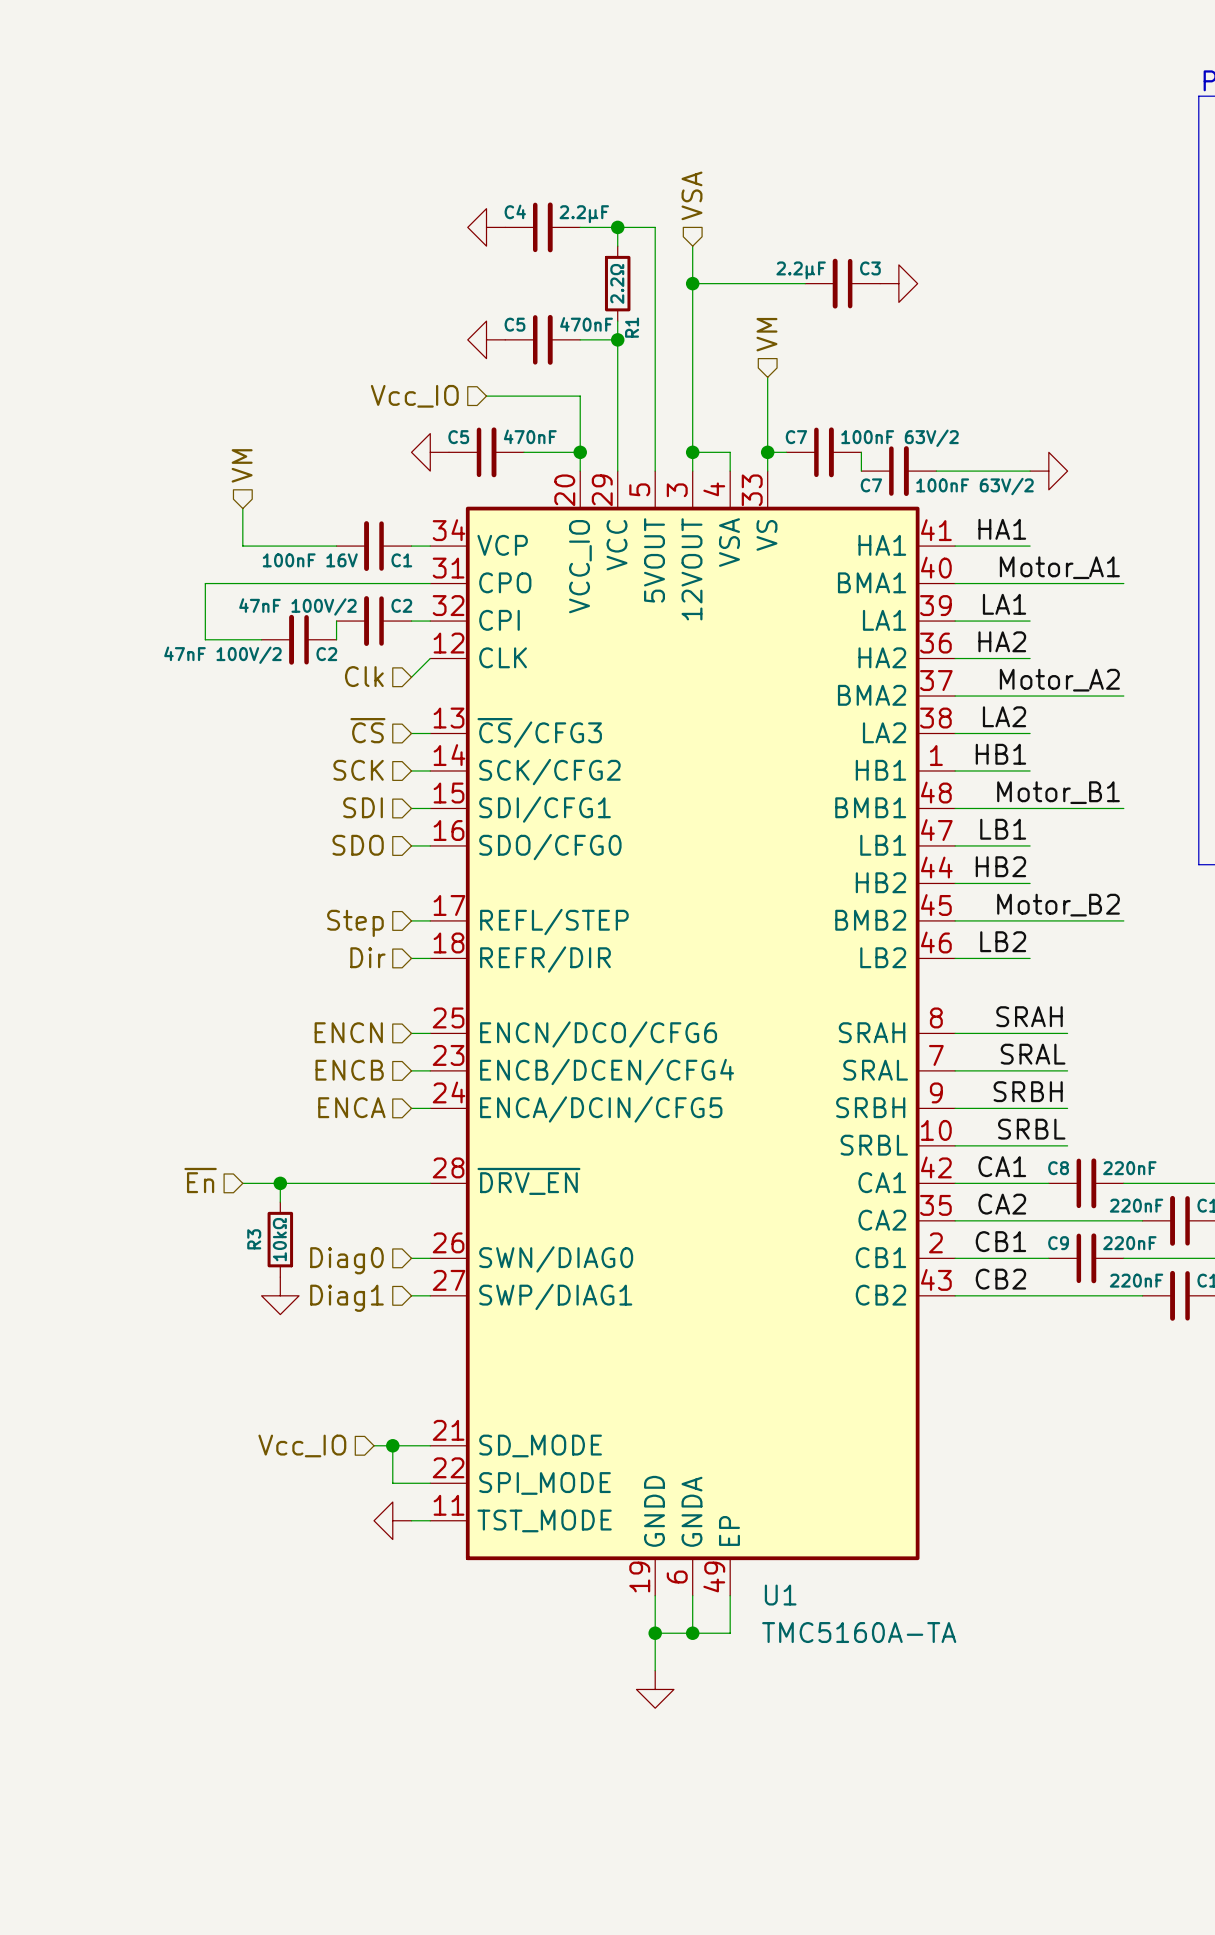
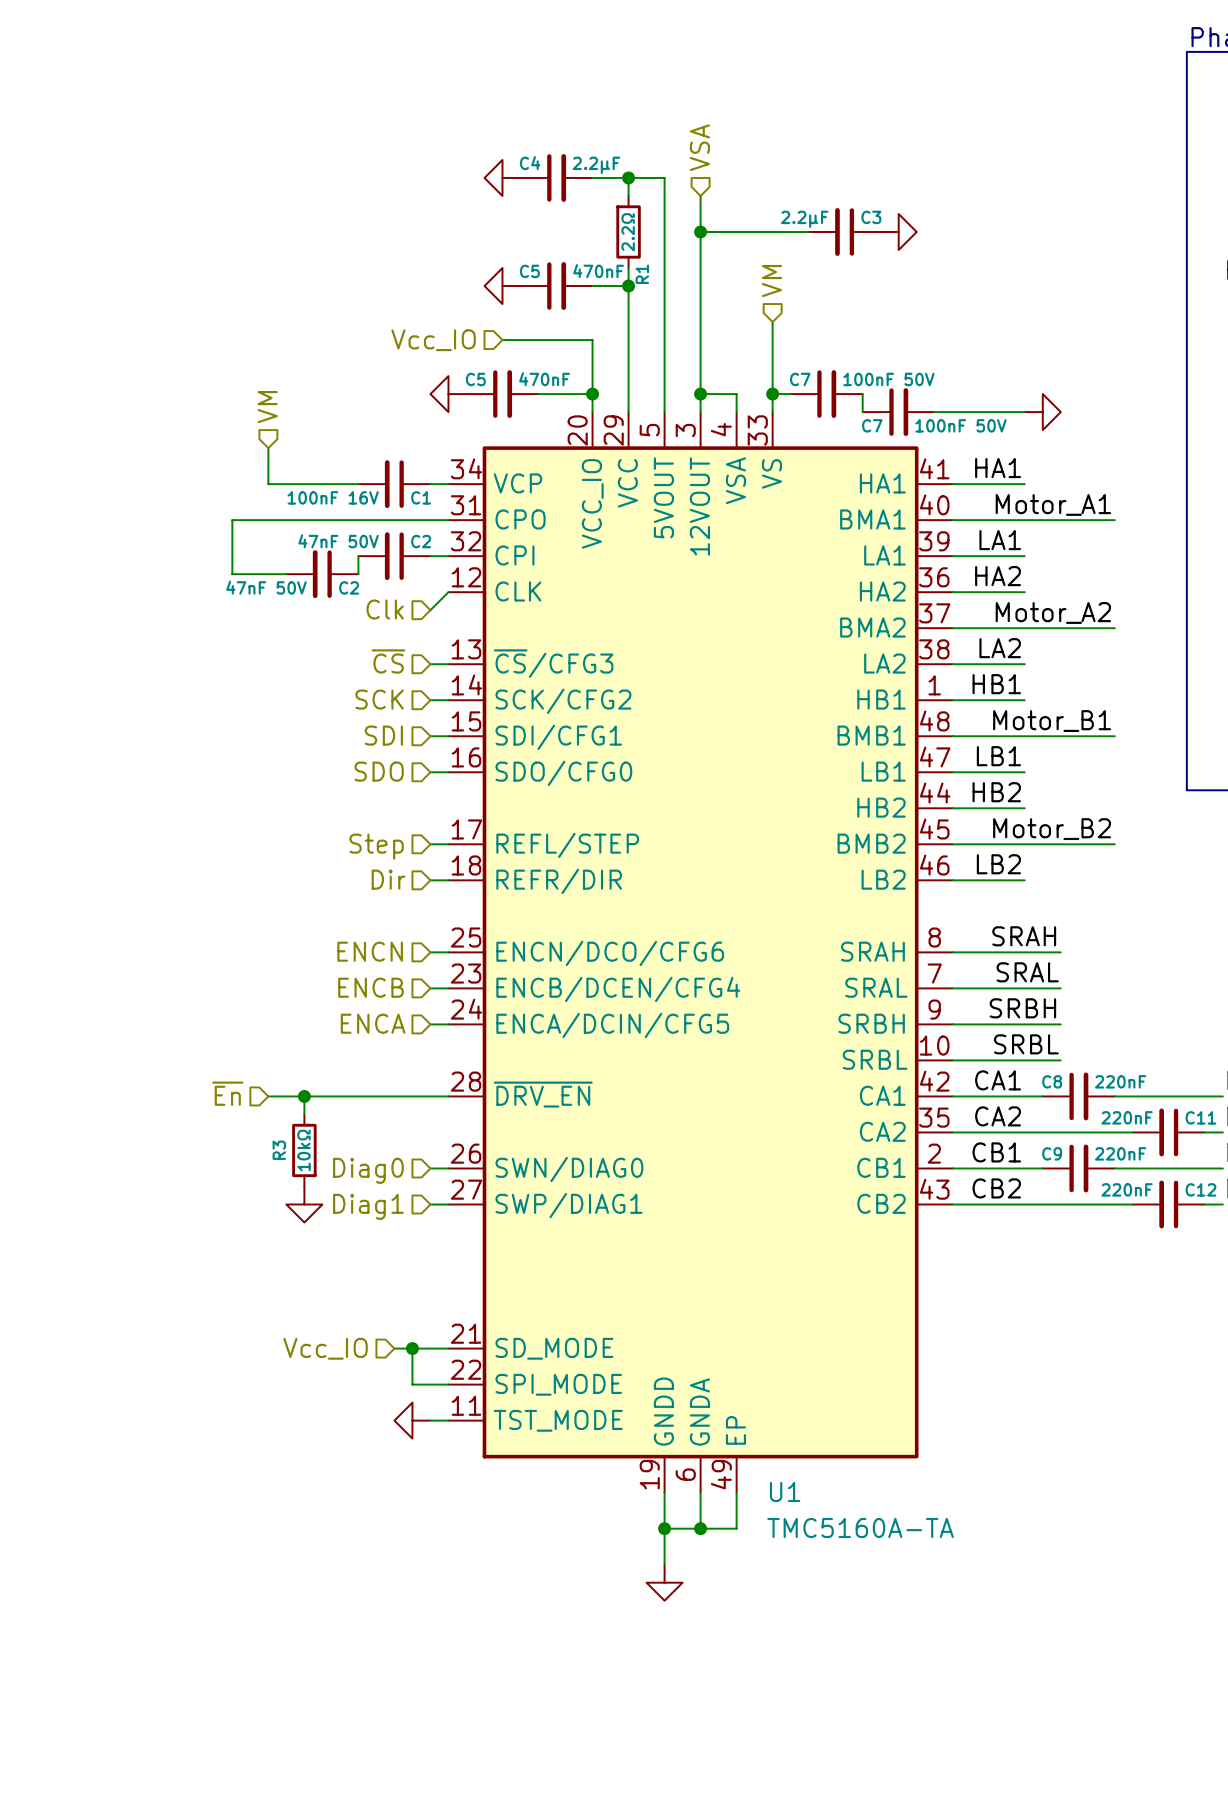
C7 value: 100nF 63V/2 (900, 438) -> 100nF 50V (888, 379)
C7 value: 100nF 63V/2 (975, 486) -> 100nF 50V (961, 425)
C2 value: 47nF 100V/2 (297, 606) -> 47nF 50V (338, 541)
C2 value: 47nF 100V/2 (222, 655) -> 47nF 50V (266, 587)

